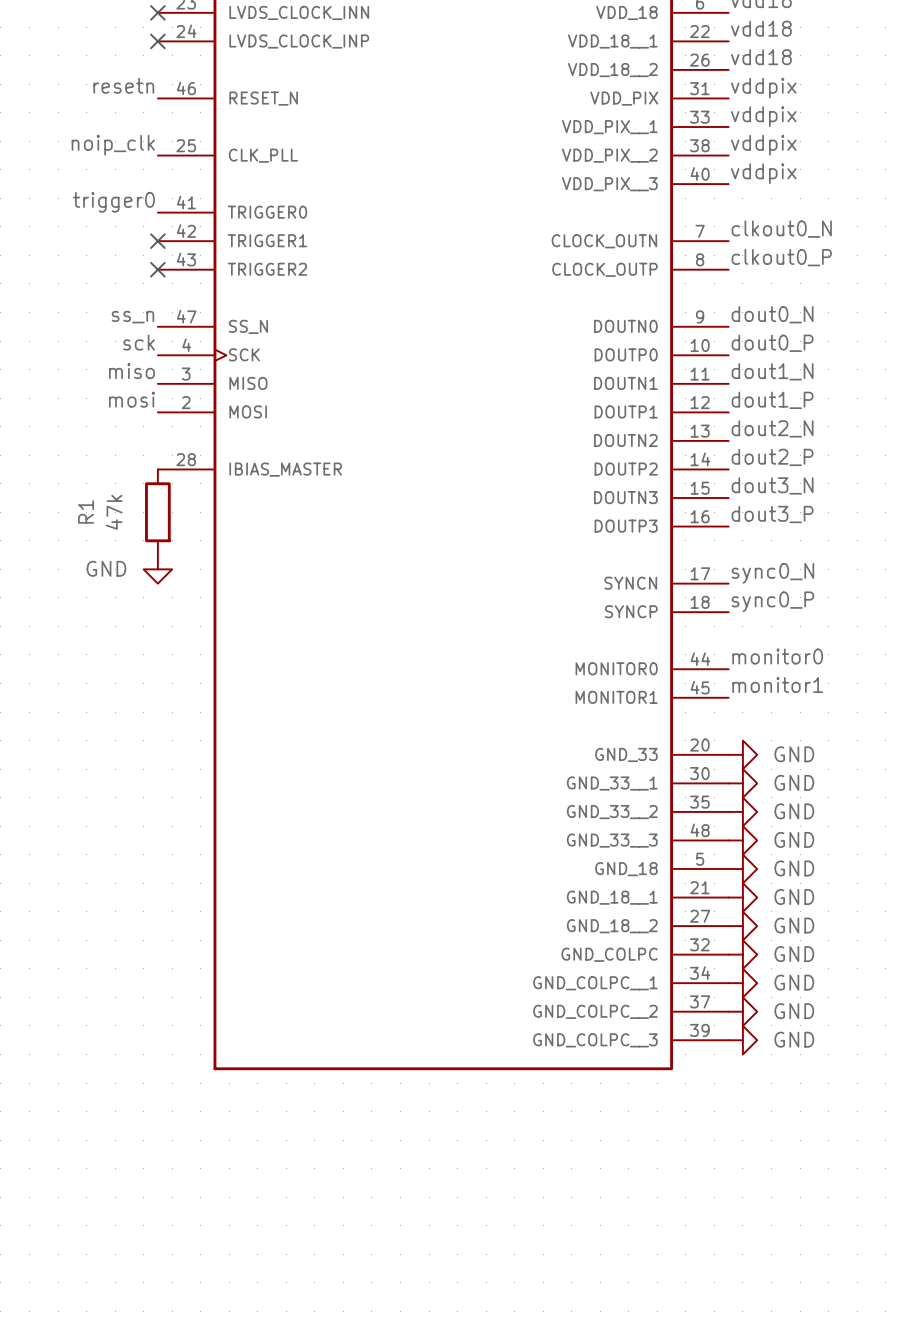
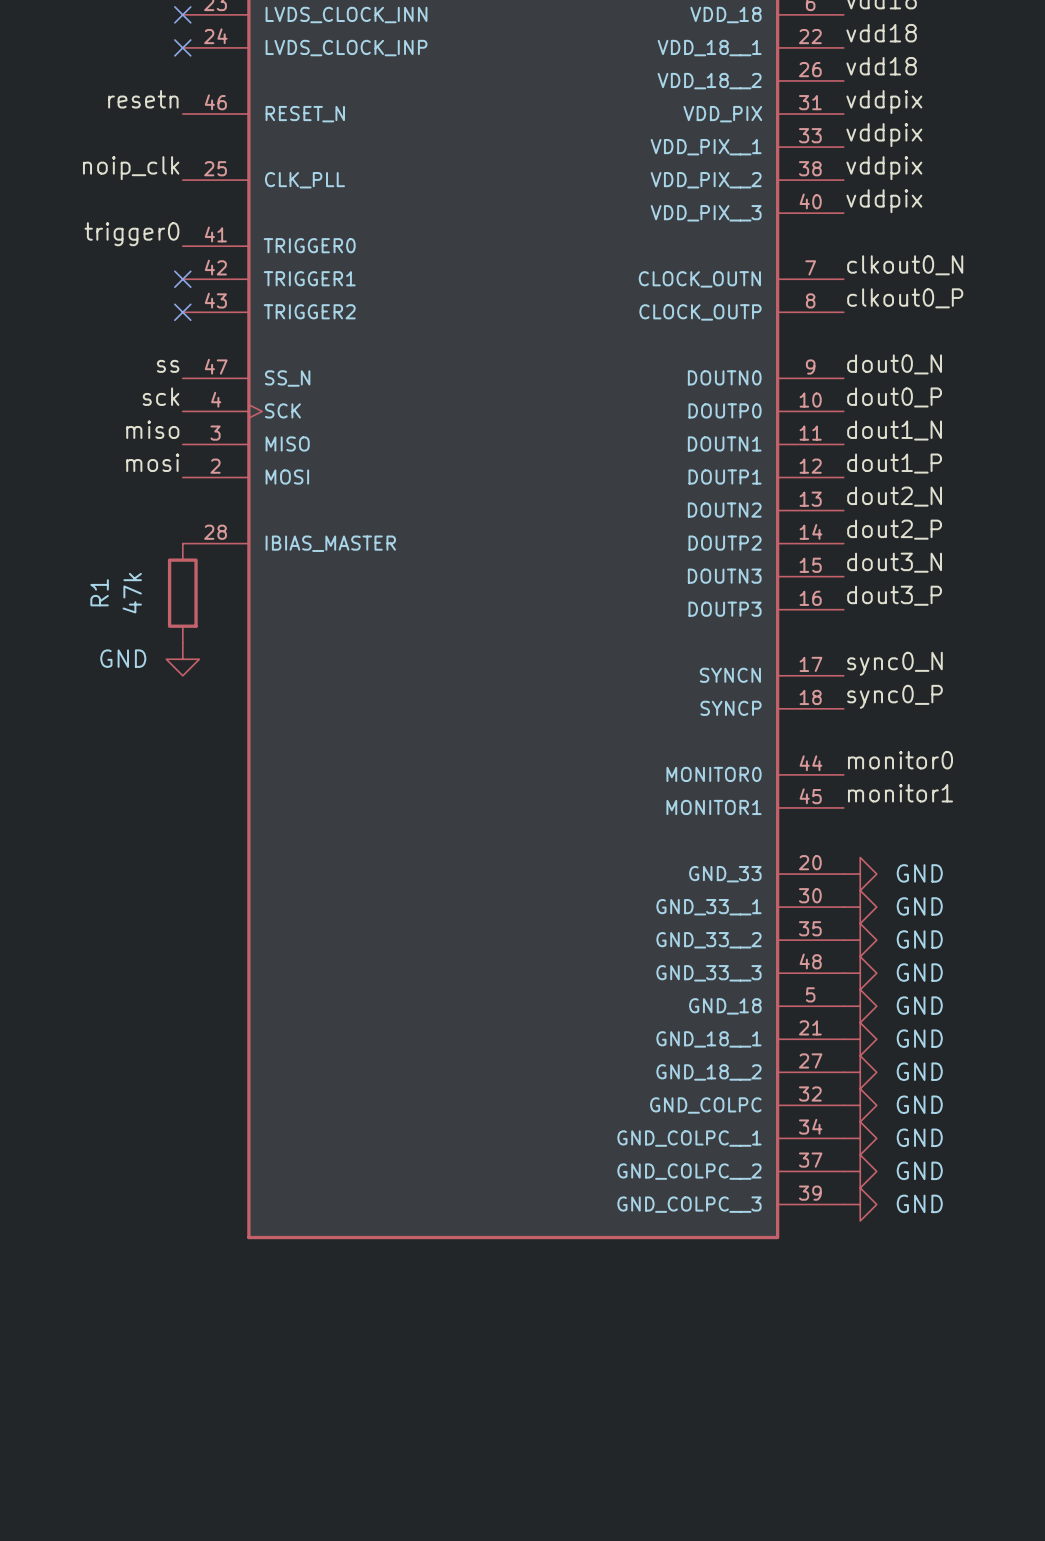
label: ss_n (132, 317) -> ss (168, 366)

